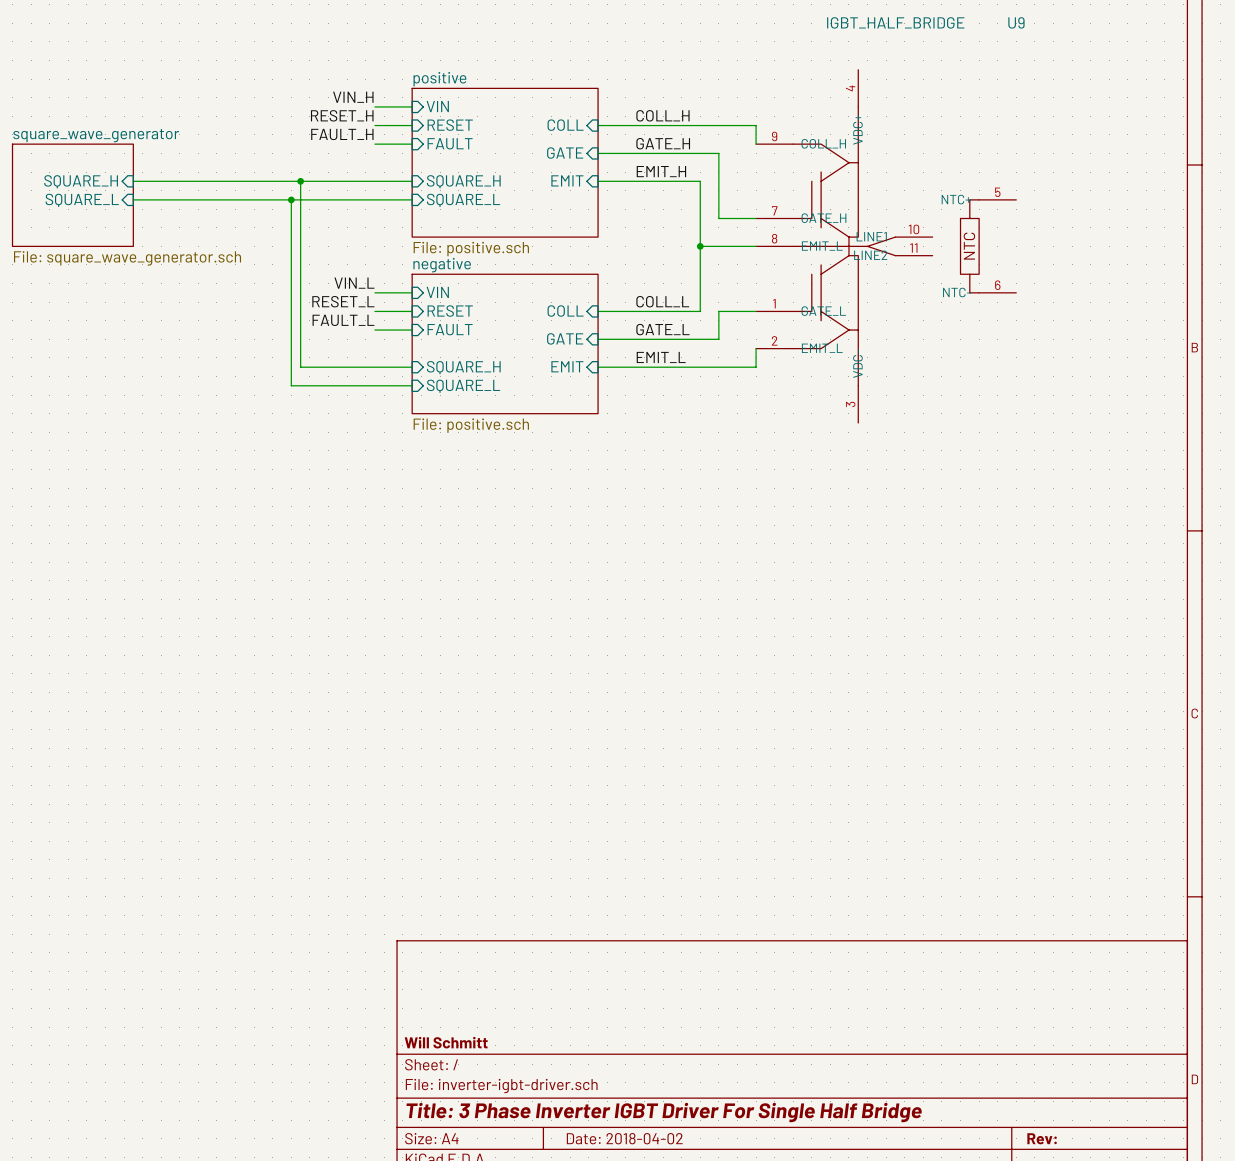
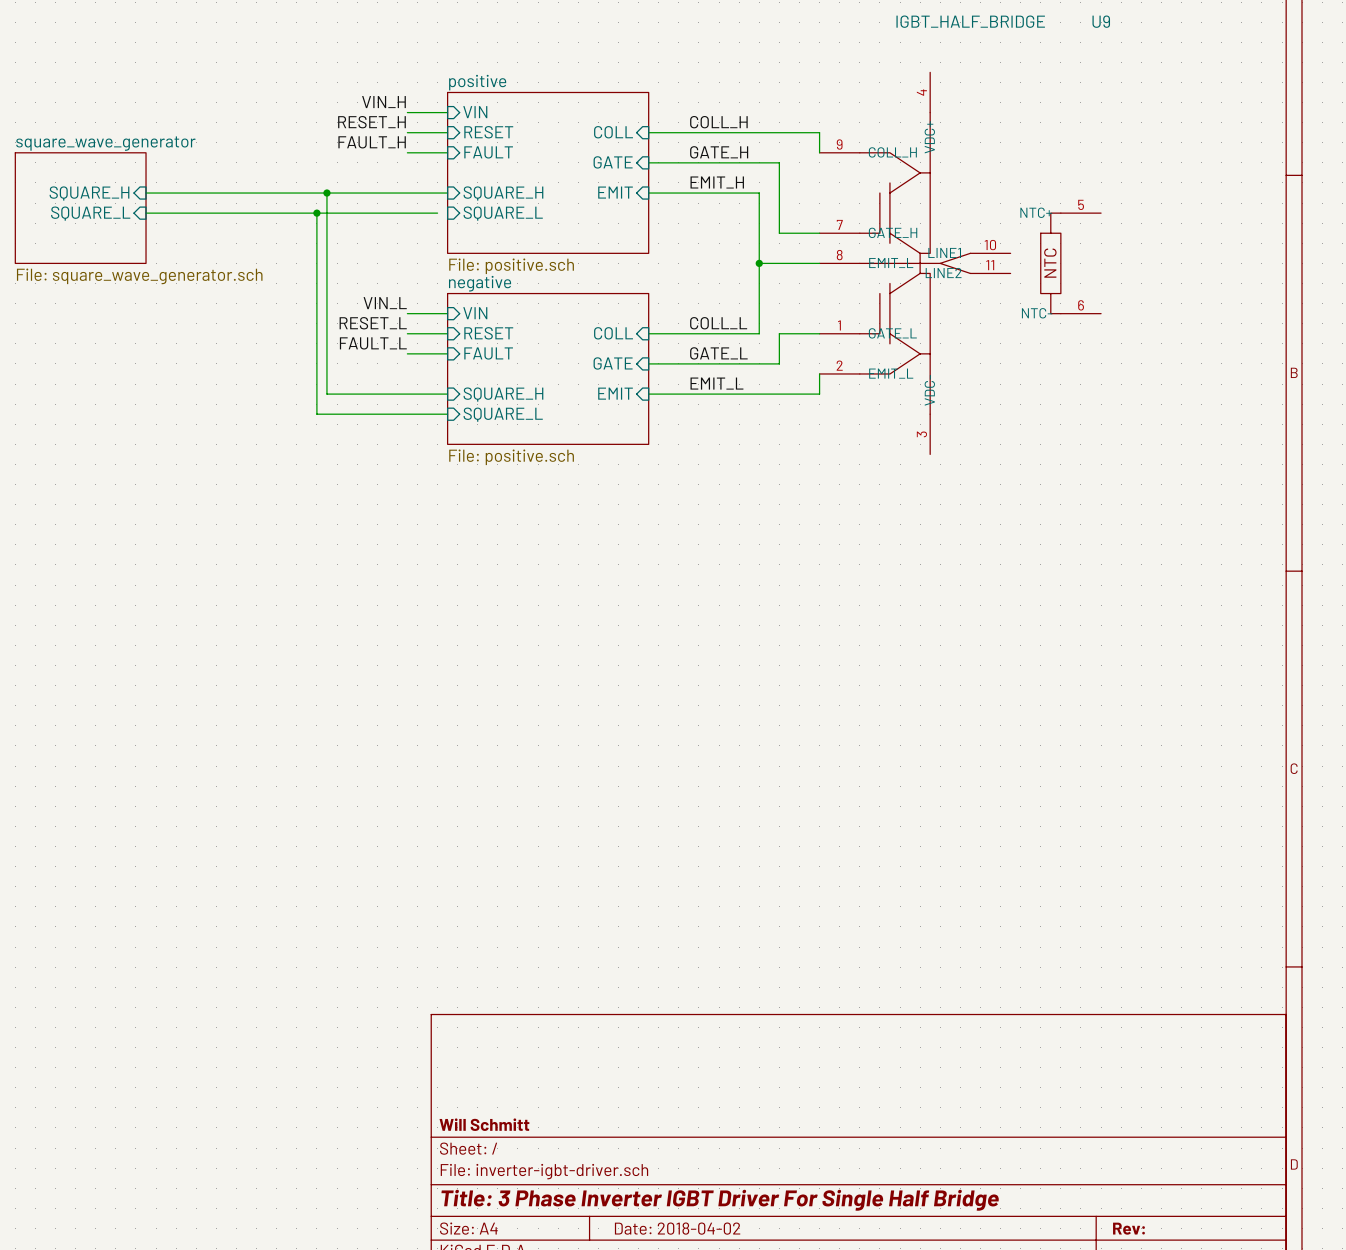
wire: (402, 199) (412, 199) -> none

